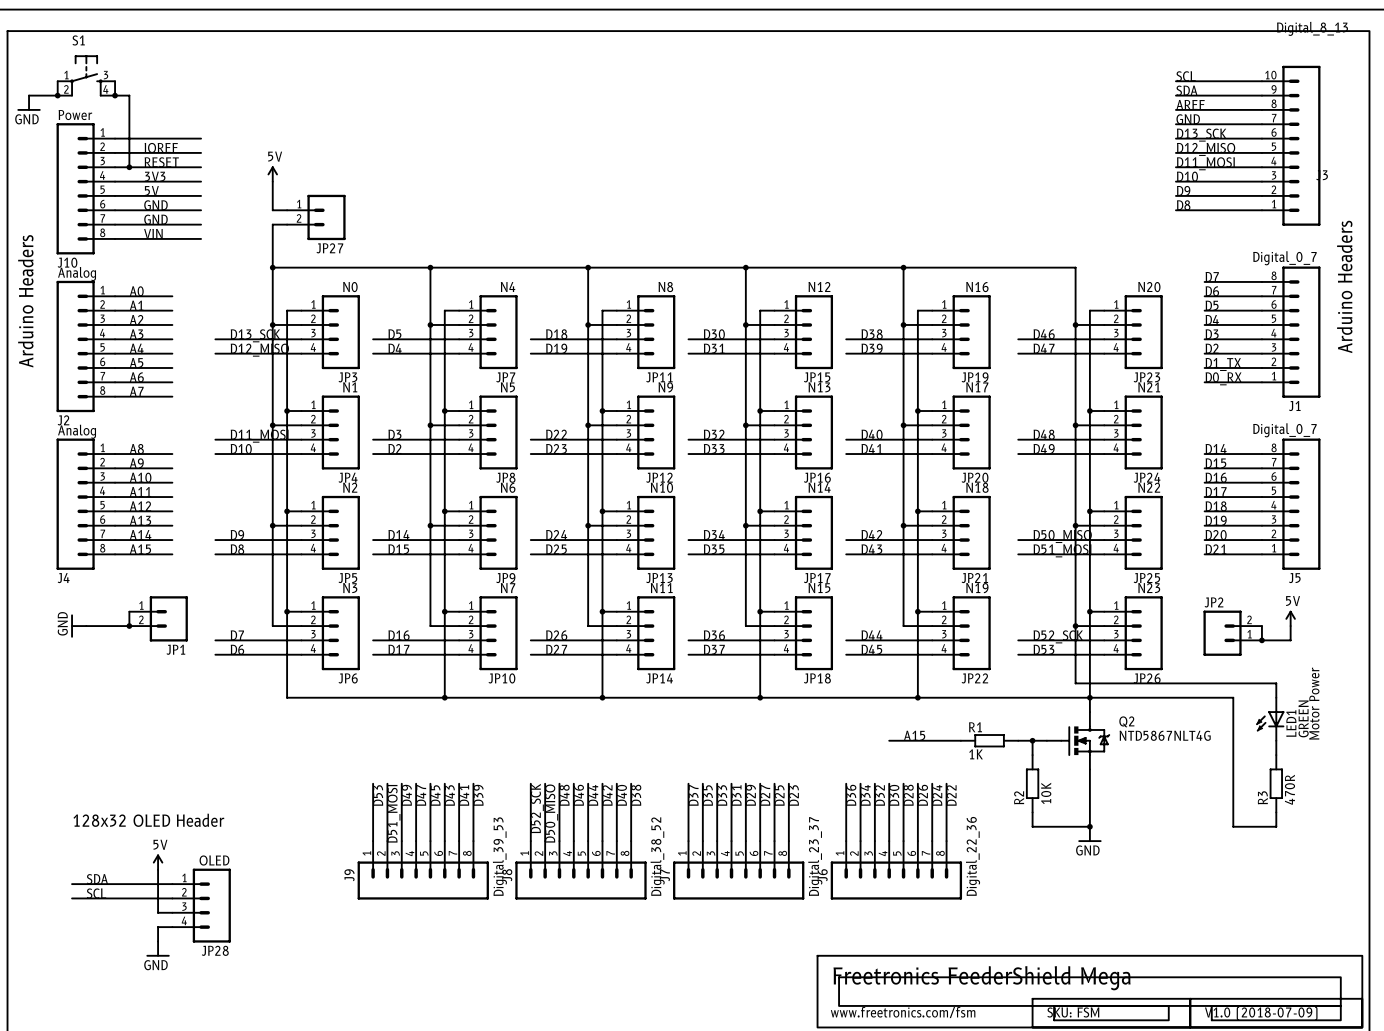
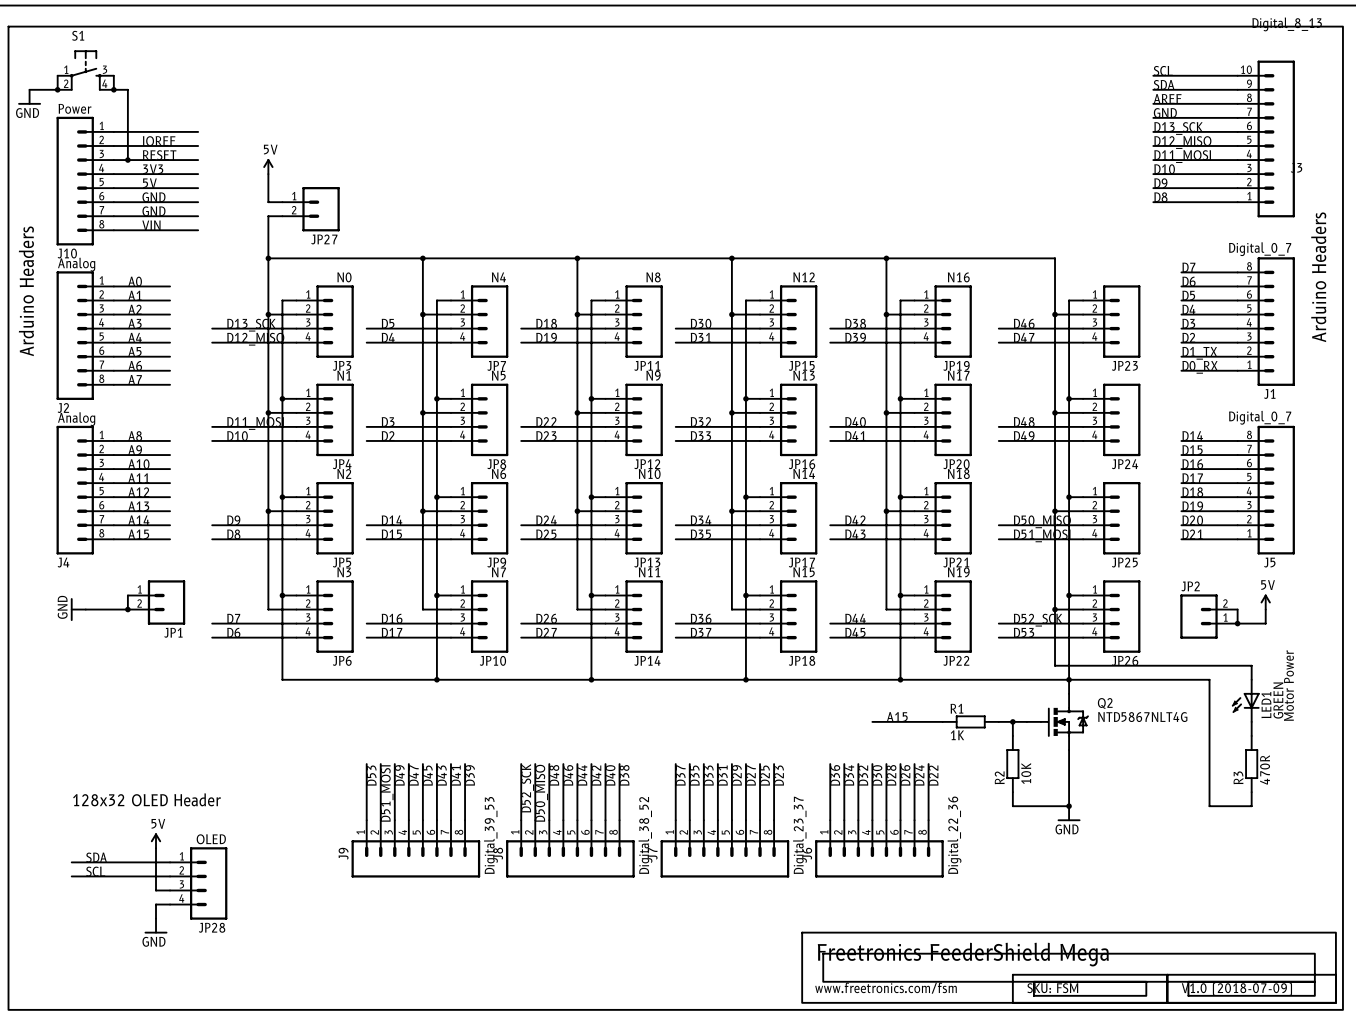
JP23 value: N20 (1149, 287) -> none
JP24 value: N21 (1149, 387) -> none
JP25 value: N22 (1149, 487) -> none
JP26 value: N23 (1149, 588) -> none

